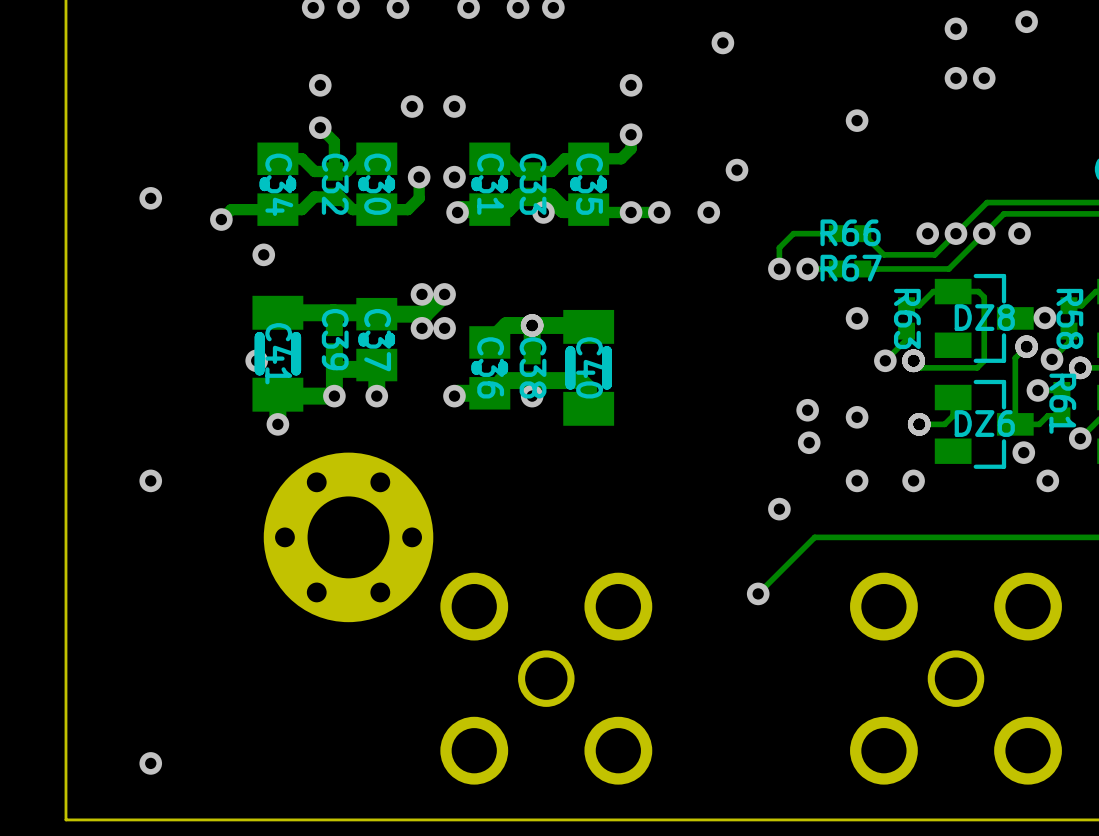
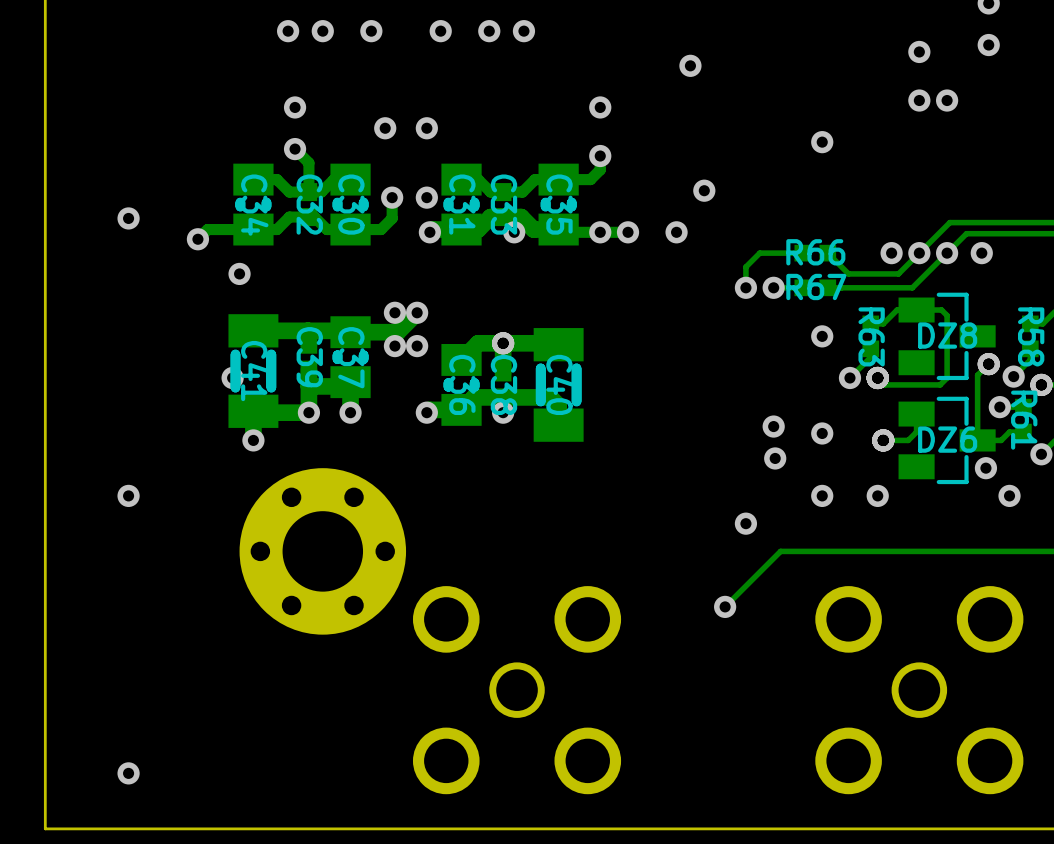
via: (1044, 317) -> none

